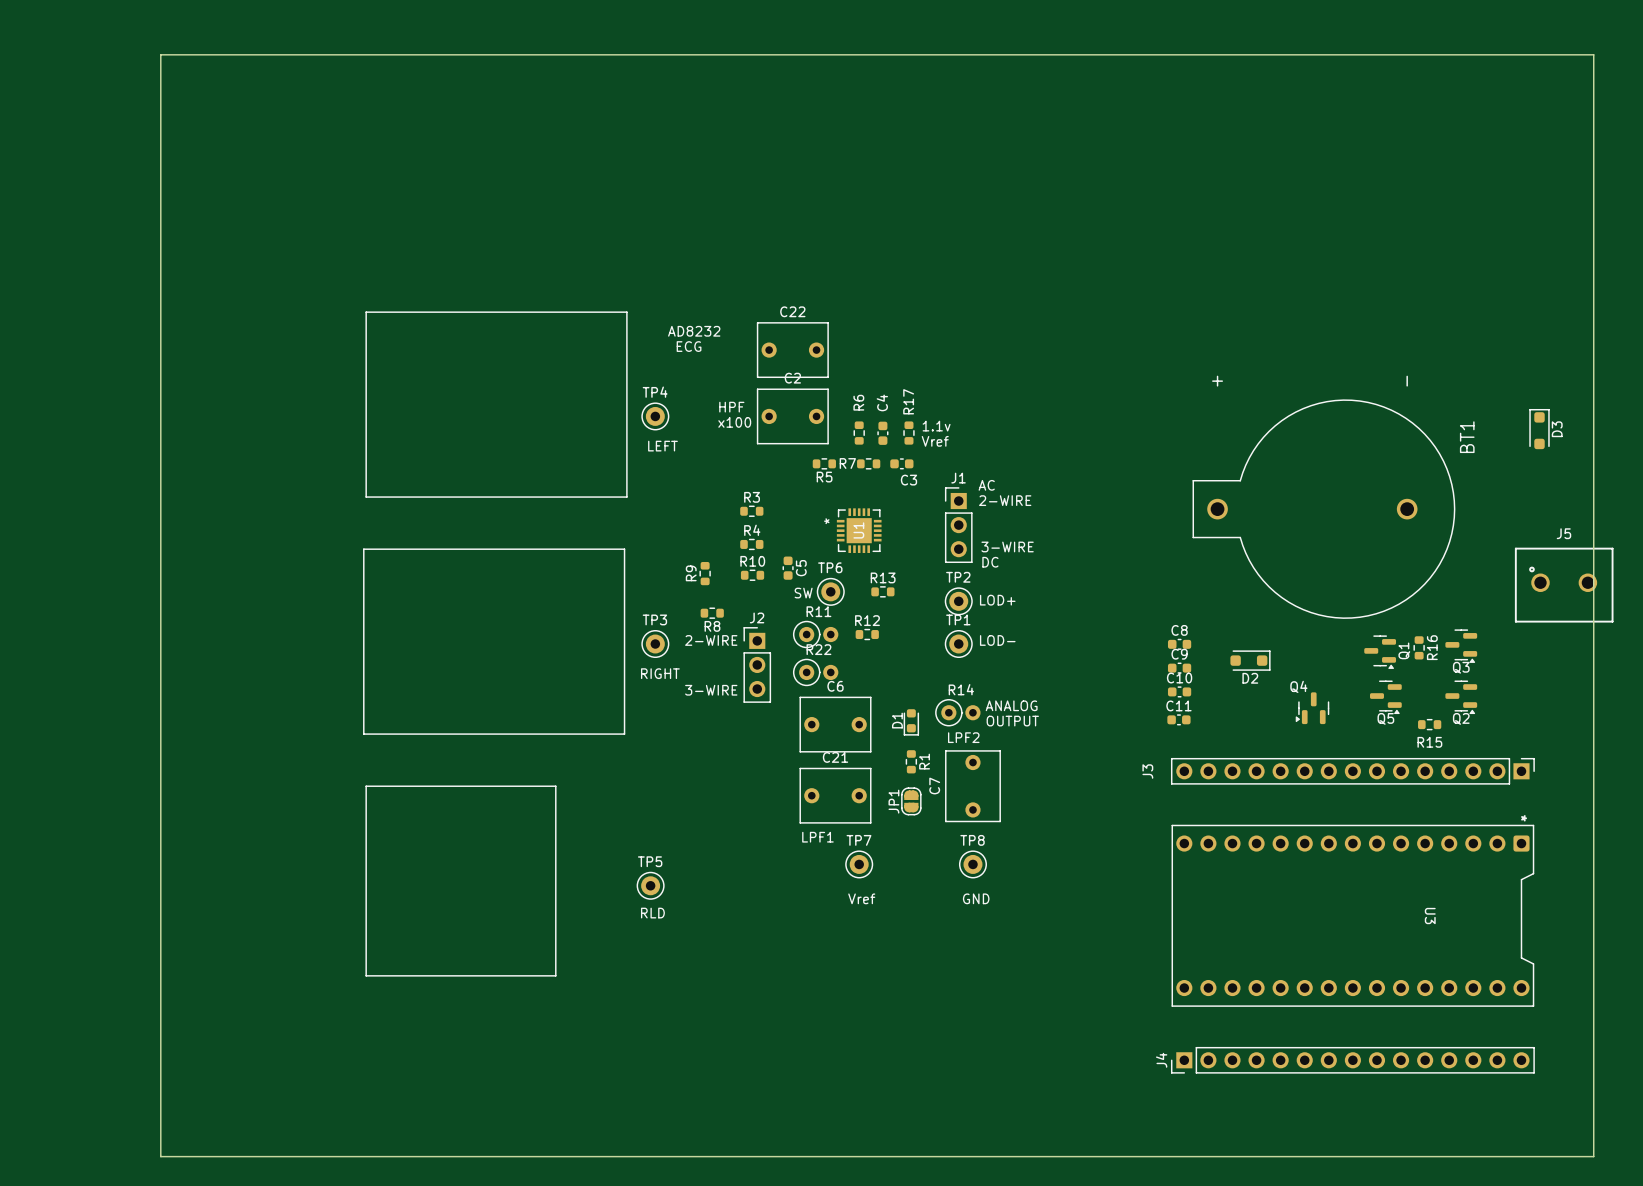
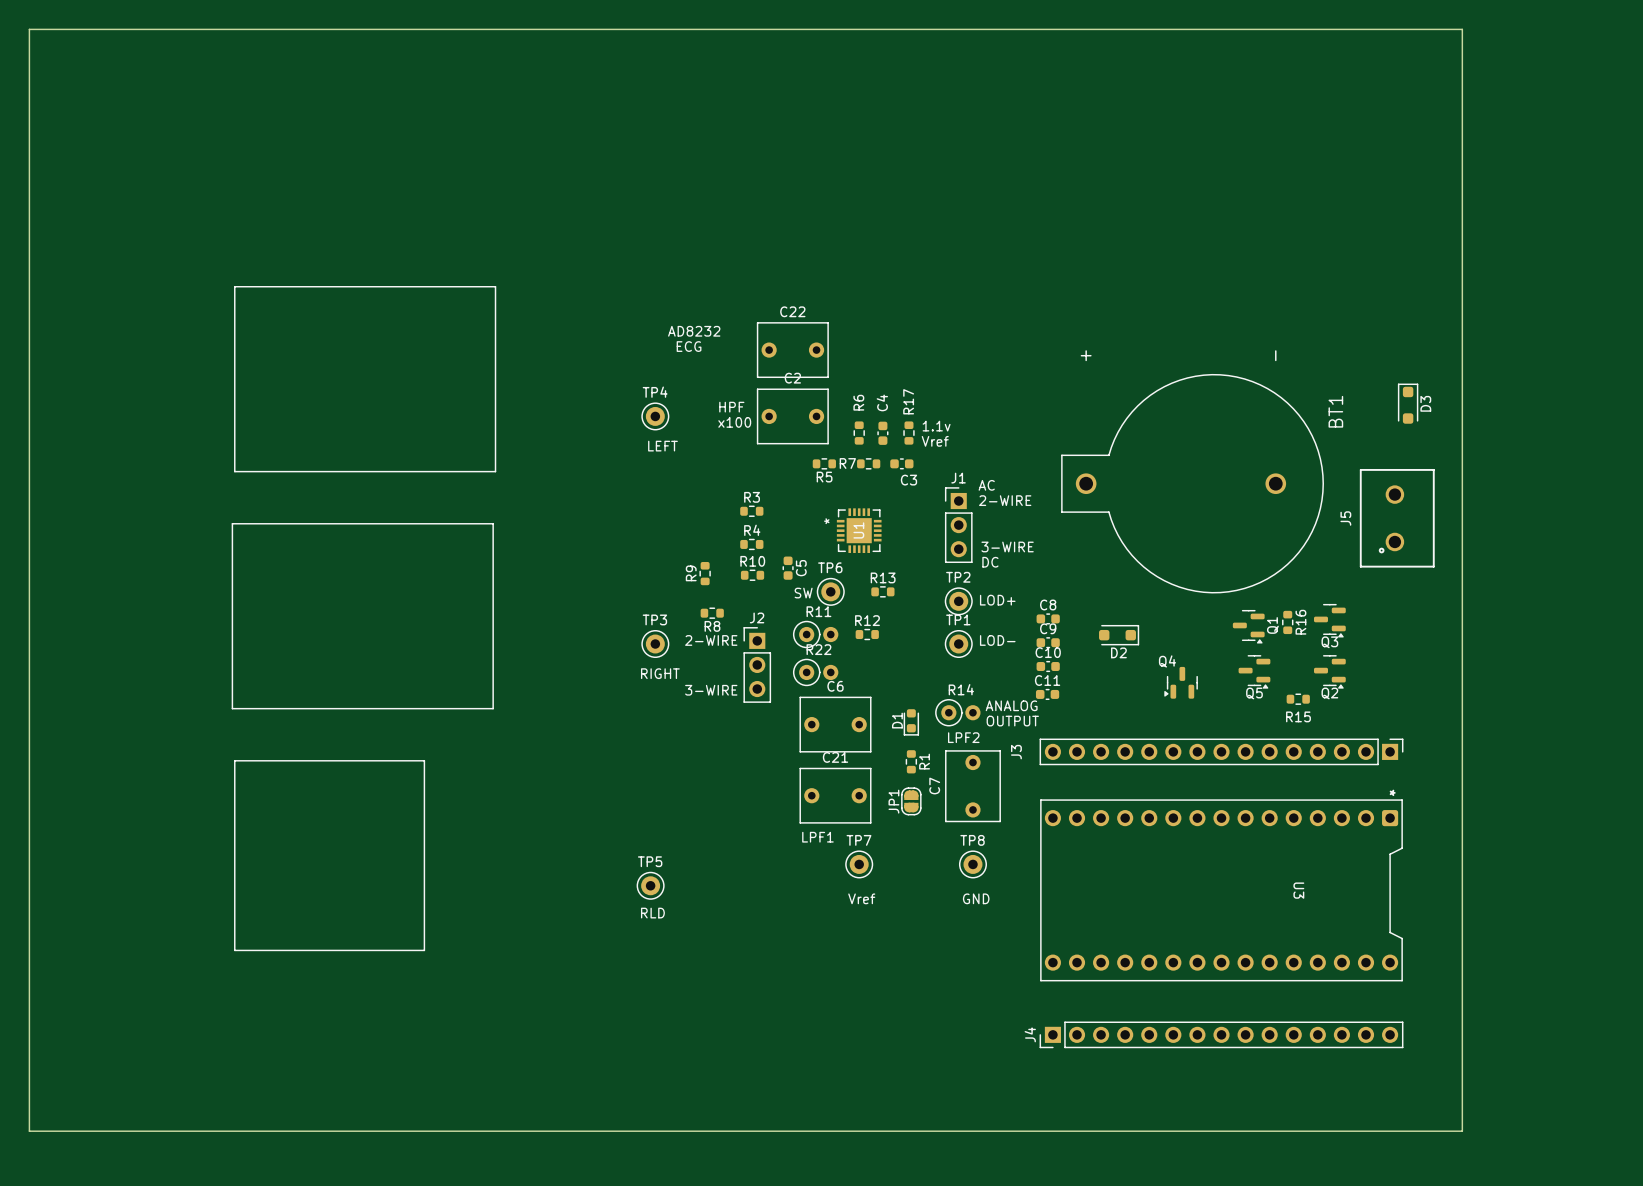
board edge: (160, 54) (1593, 54) (1593, 1156) (160, 1156) (160, 54) -> (29, 29) (1462, 29) (1462, 1131) (29, 1131) (29, 29)
line: (366, 312) (626, 312) (626, 497) (366, 497) (366, 312) -> (234, 286) (495, 286) (495, 471) (234, 471) (234, 286)
D3 position: (1539, 429) -> (1408, 403)
BT1 position: (1323, 497) -> (1192, 471)
line: (363, 549) (624, 549) (624, 734) (363, 734) (363, 549) -> (232, 523) (493, 523) (493, 708) (232, 708) (232, 523)
J5 rotation: 0° (1564, 585) -> 90° counterclockwise (1397, 518)
J5 position: (1564, 585) -> (1397, 518)
C8 position: (1179, 644) -> (1048, 618)
Q3 position: (1461, 646) -> (1329, 620)
R16 position: (1419, 647) -> (1287, 622)
Q1 position: (1380, 652) -> (1248, 626)
D2 position: (1250, 660) -> (1119, 635)
C9 position: (1179, 668) -> (1048, 642)
C10 position: (1179, 691) -> (1048, 666)
Q5 position: (1385, 697) -> (1254, 671)
Q2 position: (1461, 697) -> (1329, 671)
Q4 position: (1312, 708) -> (1181, 682)
C11 position: (1178, 719) -> (1047, 694)
R15 position: (1429, 724) -> (1298, 699)
J3 position: (1352, 771) -> (1221, 751)
line: (366, 786) (366, 975) (555, 975) (555, 786) (366, 786) -> (234, 760) (234, 950) (424, 950) (424, 760) (234, 760)
U3 position: (1352, 915) -> (1221, 890)
J4 position: (1352, 1060) -> (1221, 1034)

